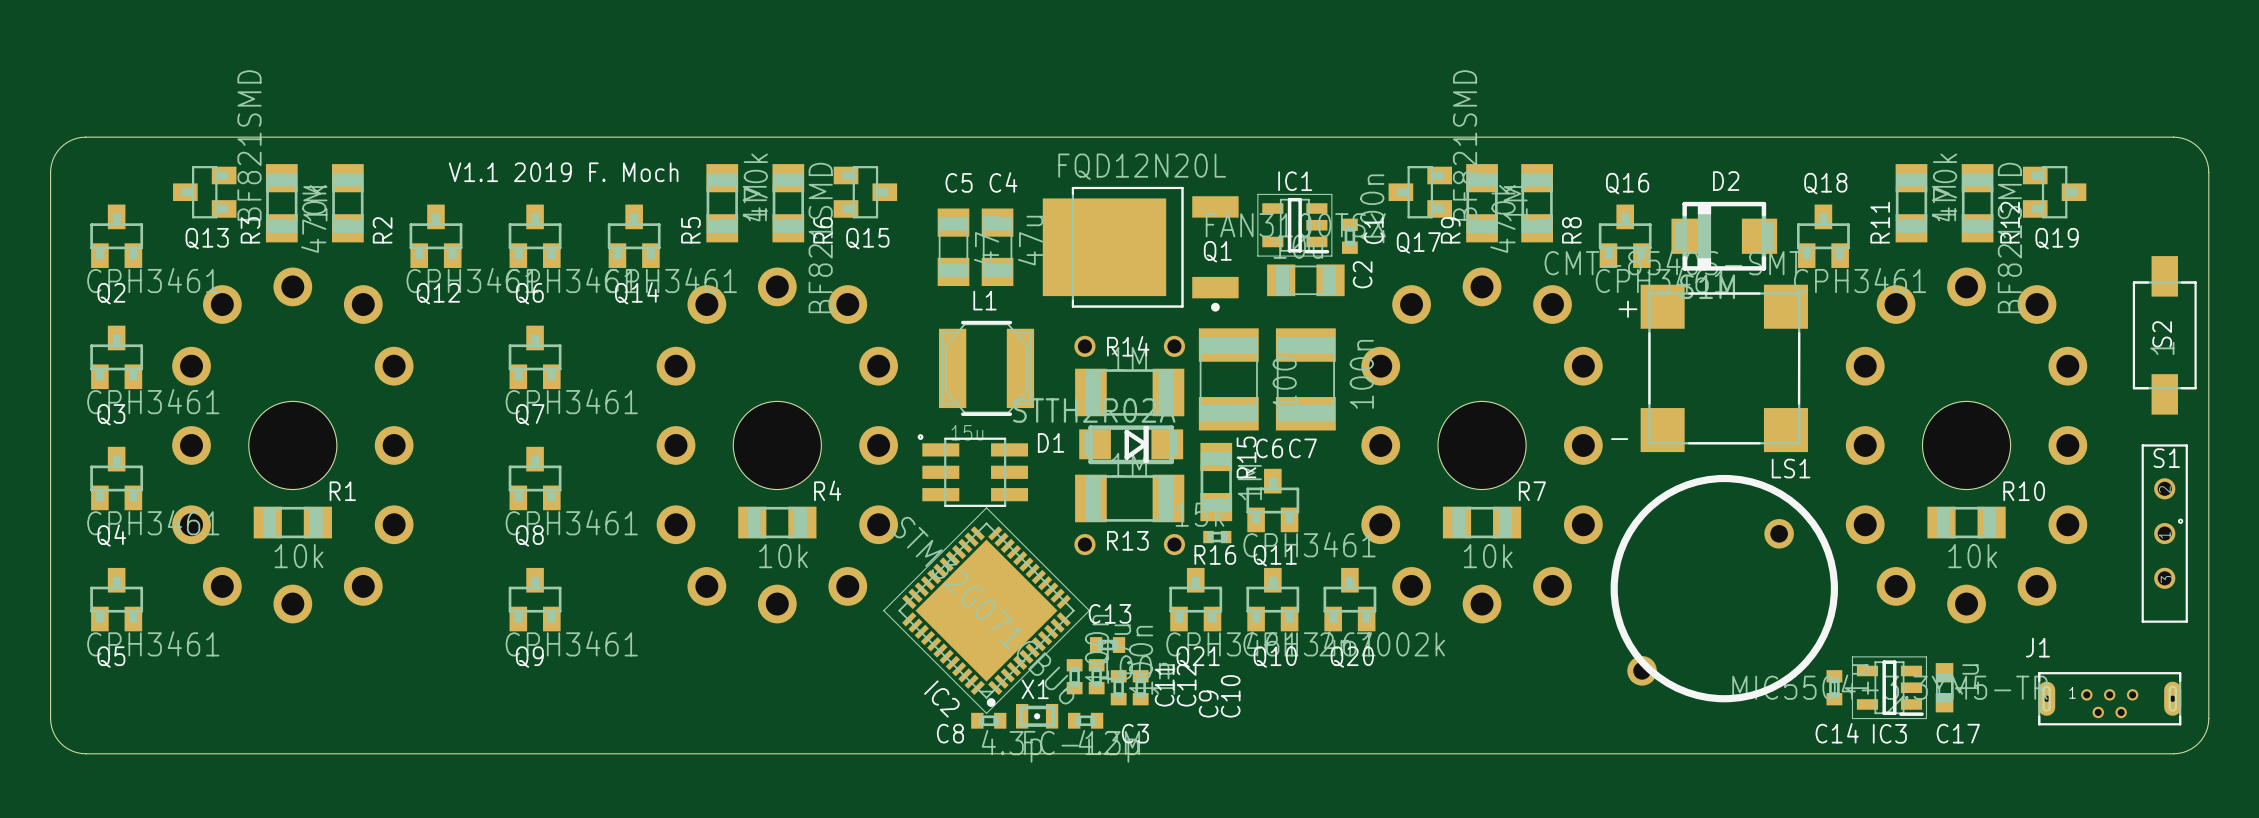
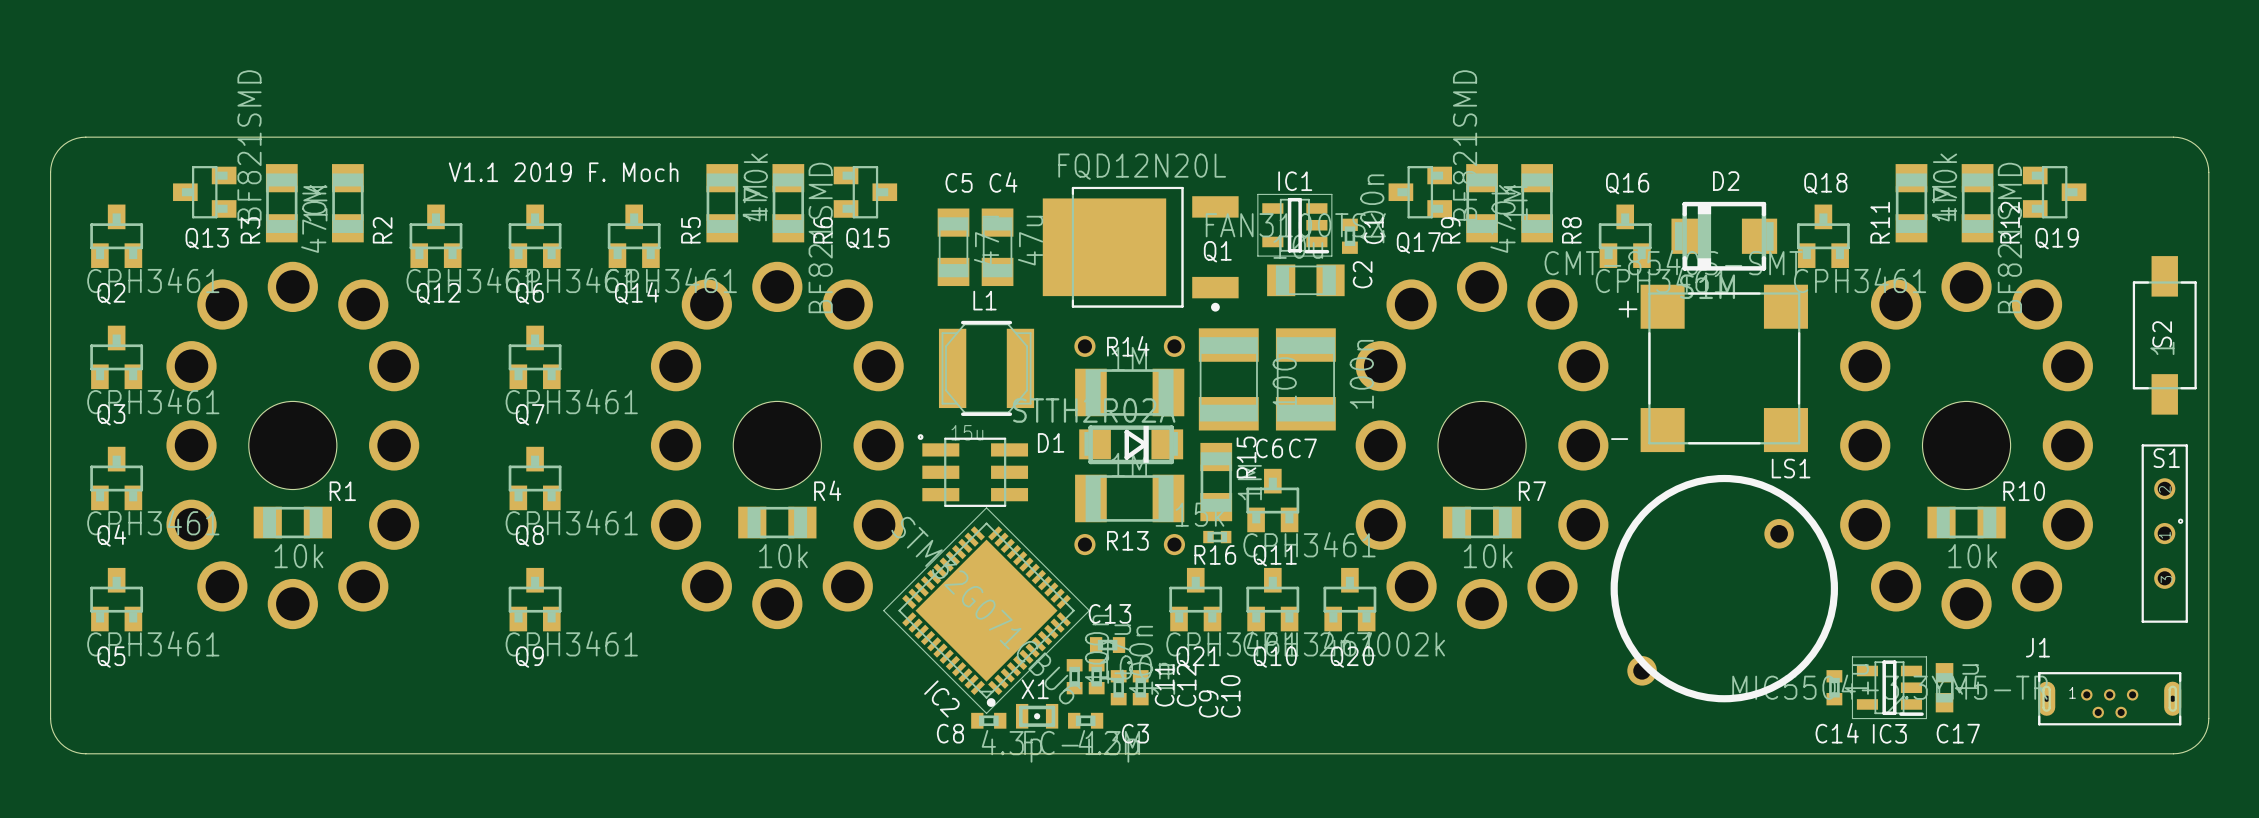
part footprint: [172, 267, 414, 624] -> [166, 261, 420, 630]
part footprint: [656, 267, 899, 624] -> [650, 261, 904, 630]
part footprint: [1361, 267, 1603, 624] -> [1355, 261, 1609, 630]
part footprint: [1845, 267, 2088, 624] -> [1840, 261, 2093, 630]

